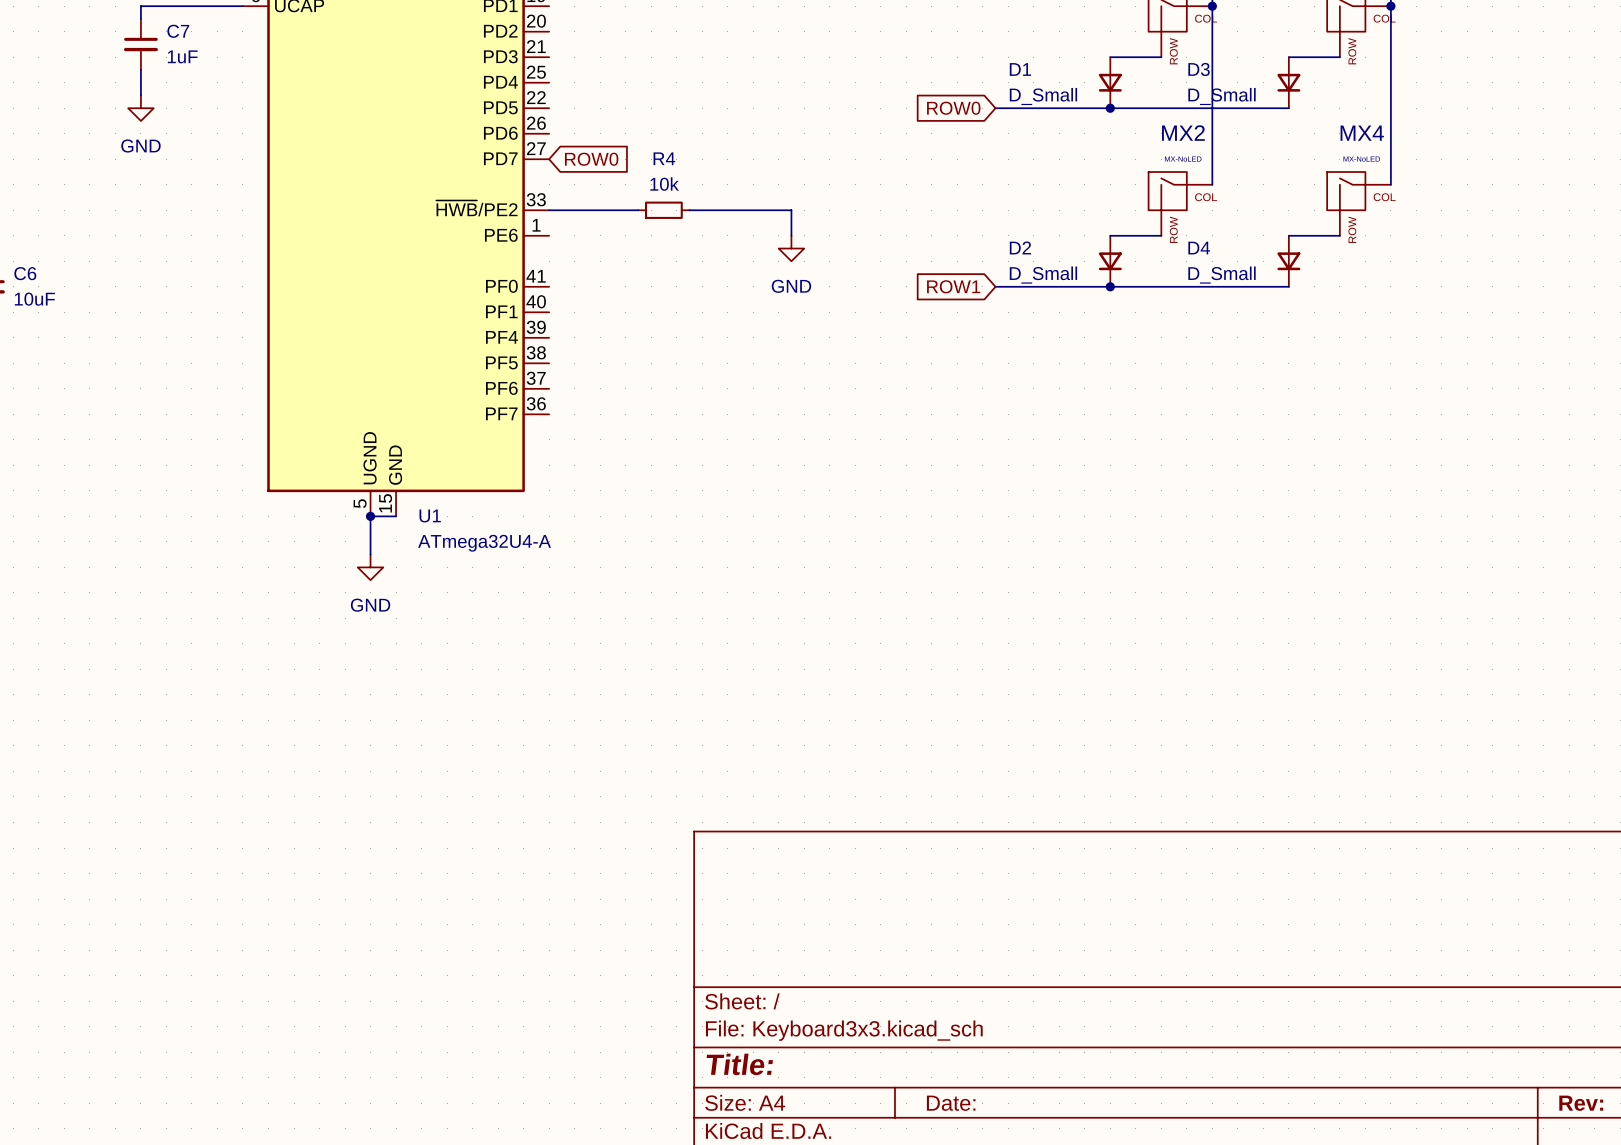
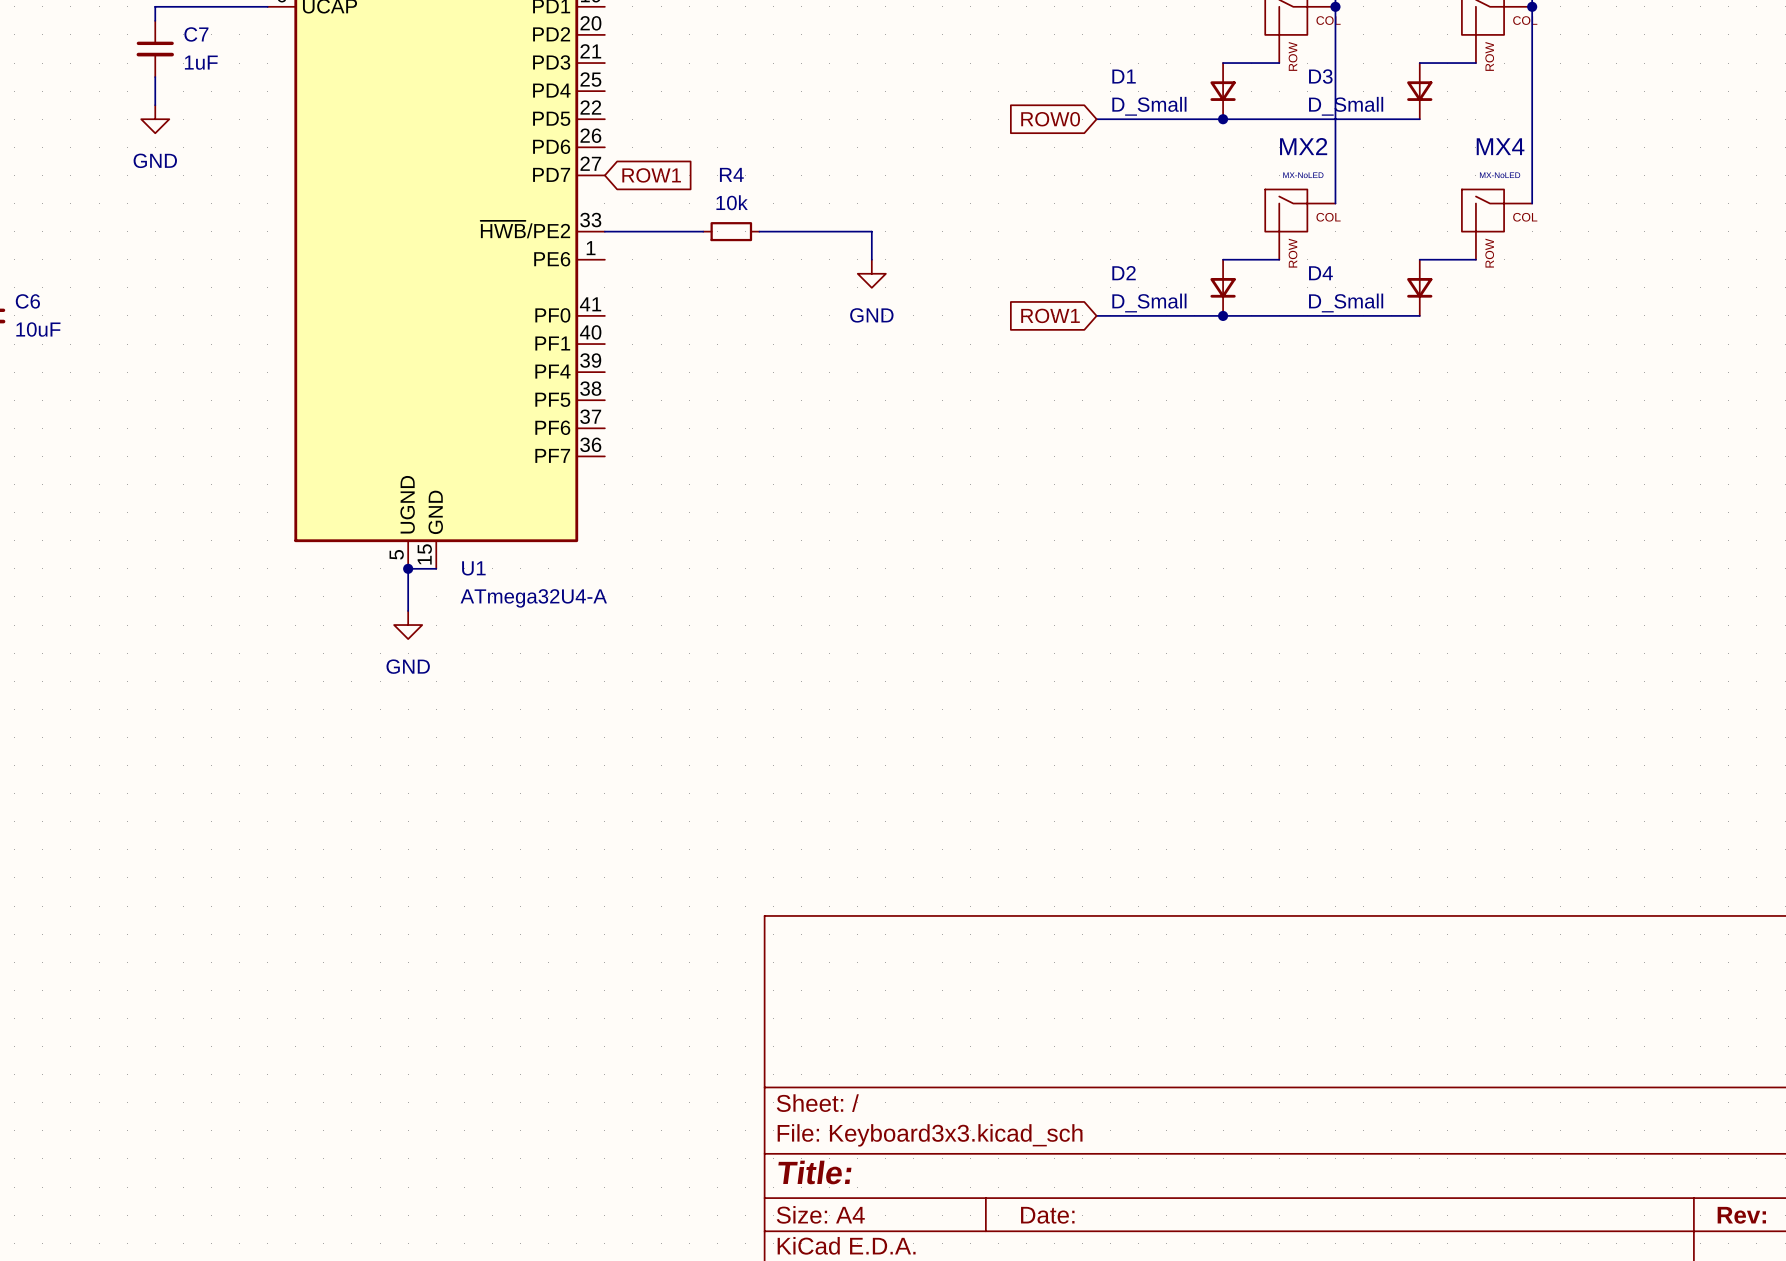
global label: ROW0 (591, 159) -> ROW1 (651, 175)

